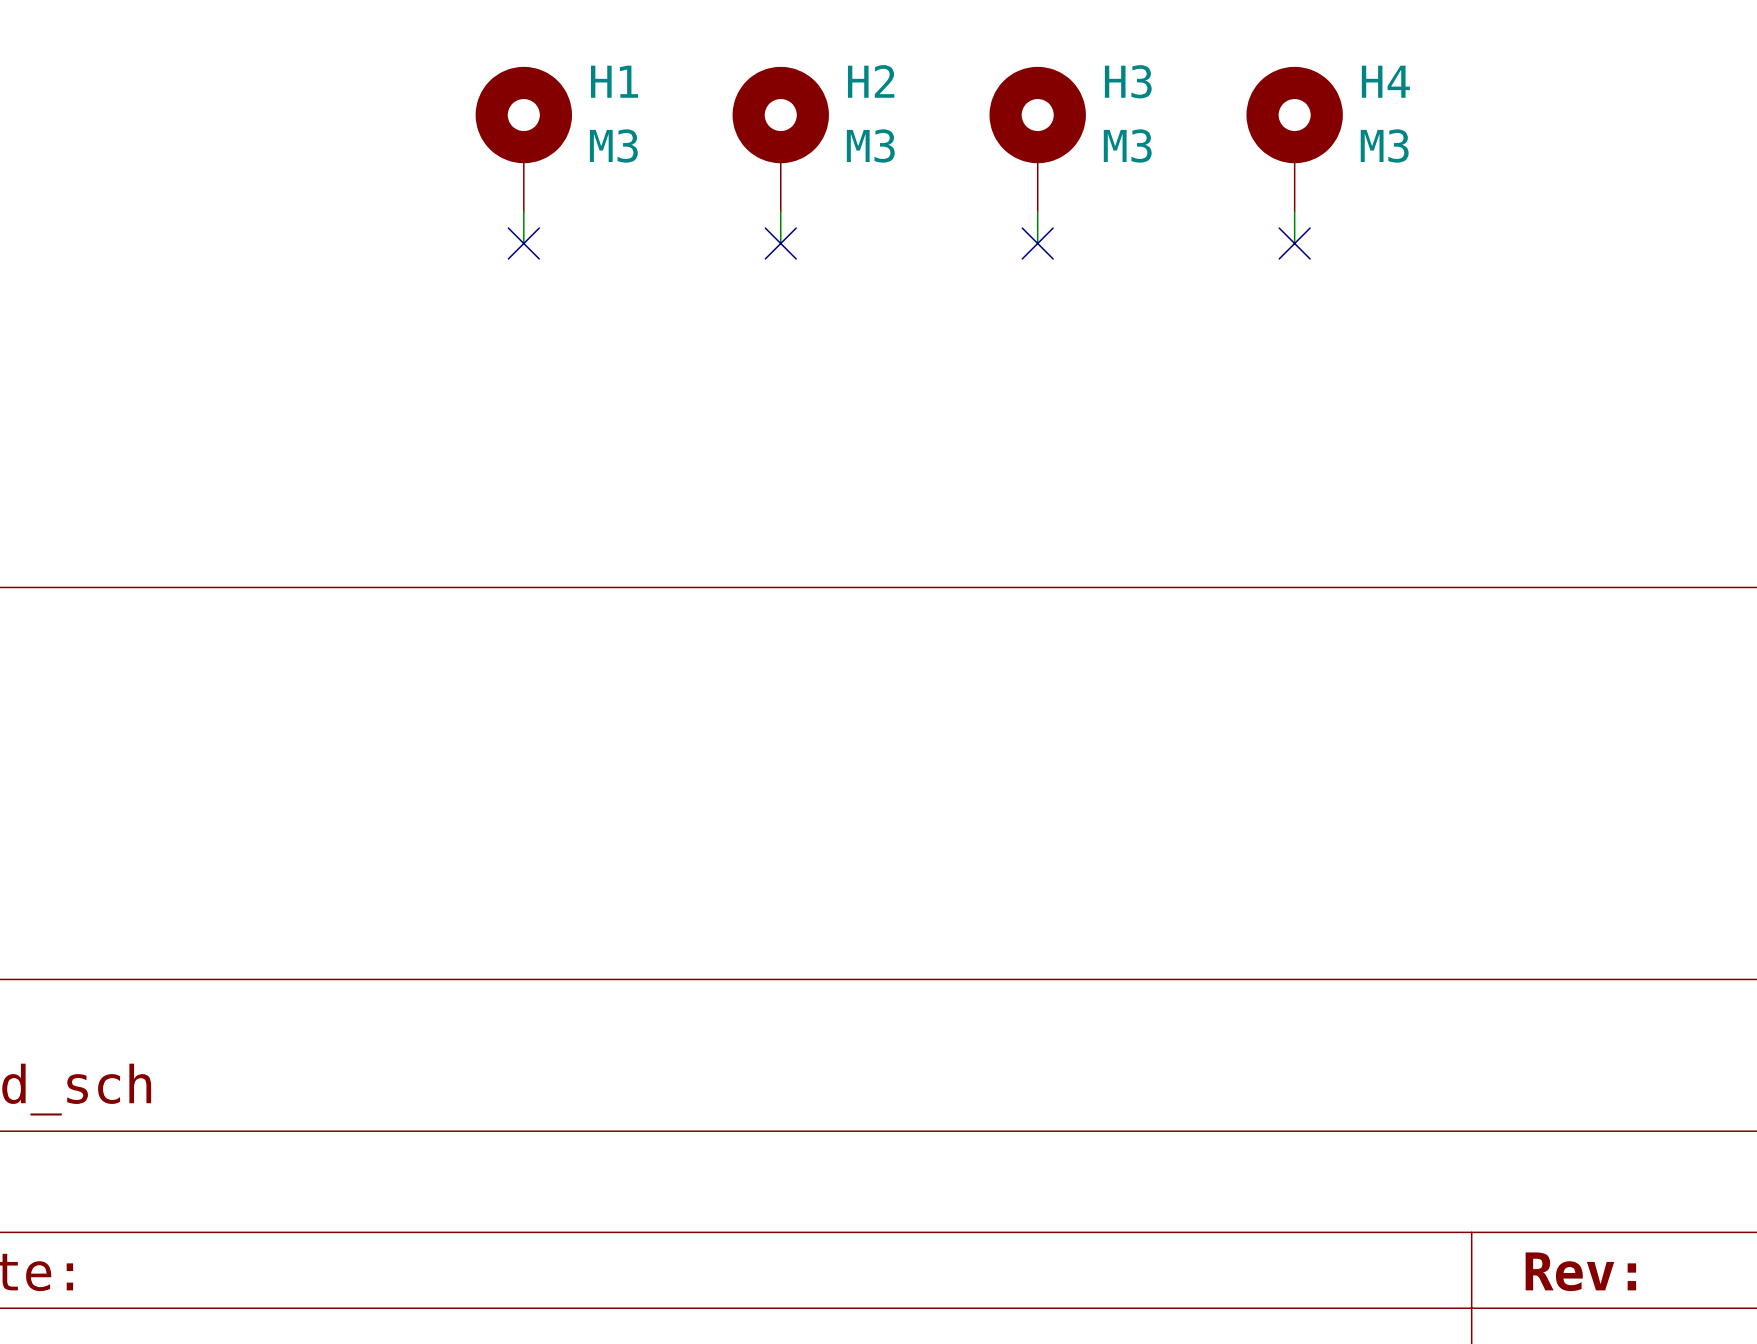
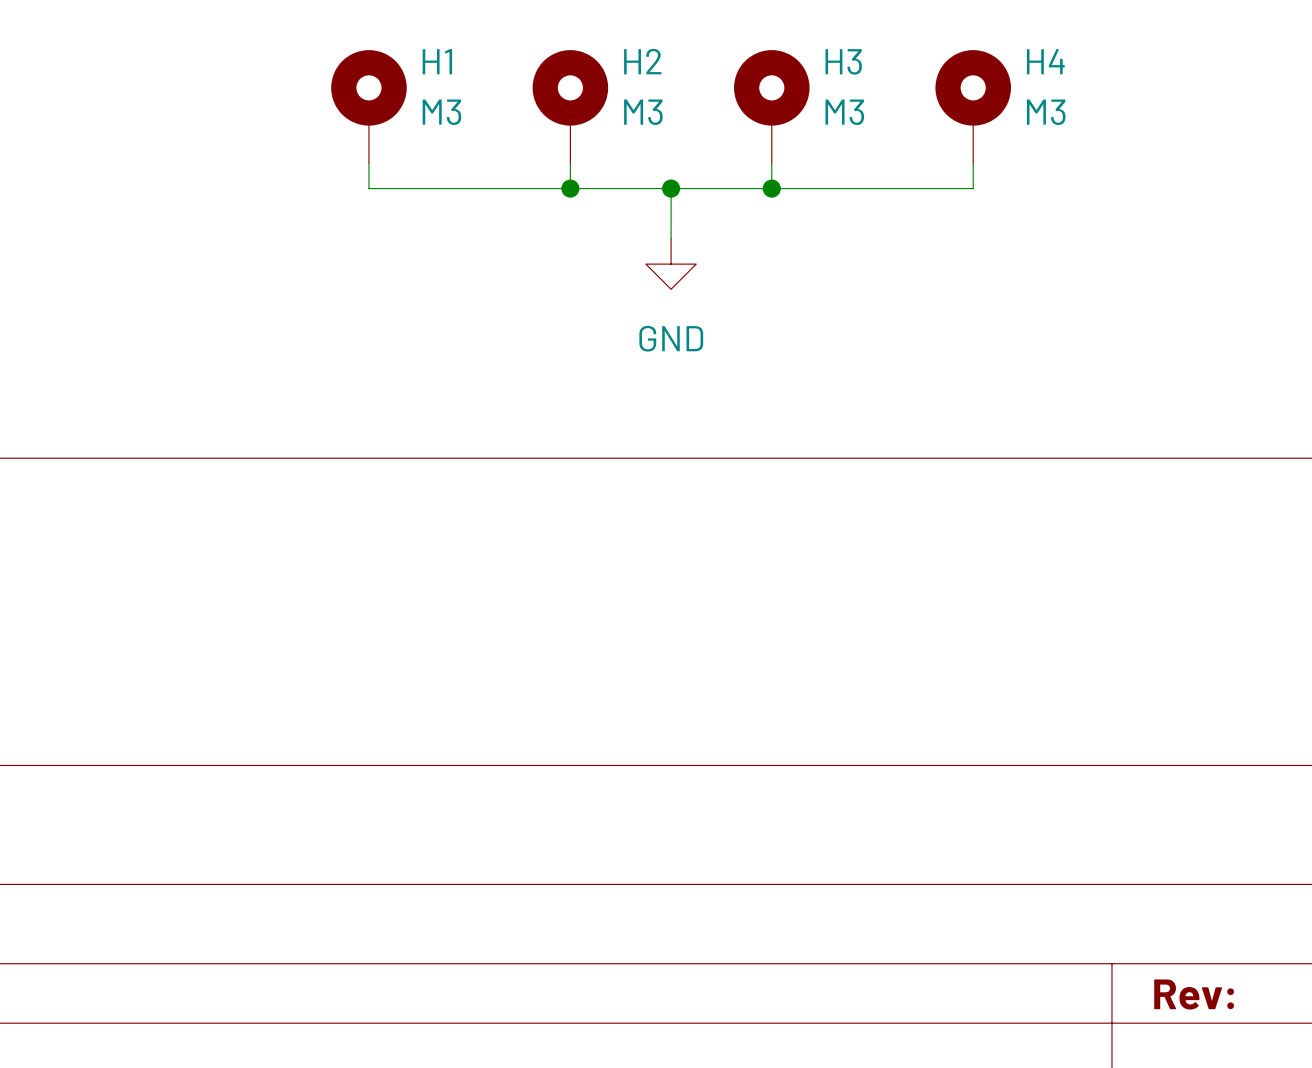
wire: none -> (368, 188) (973, 188)
no-connect mark: (523, 243) -> none
no-connect mark: (780, 243) -> none
junction: none -> (570, 188)
wire: none -> (671, 188) (671, 238)
junction: none -> (671, 188)
no-connect mark: (1037, 243) -> none
junction: none -> (771, 188)
no-connect mark: (1294, 243) -> none
power symbol: none -> GND (671, 264)

